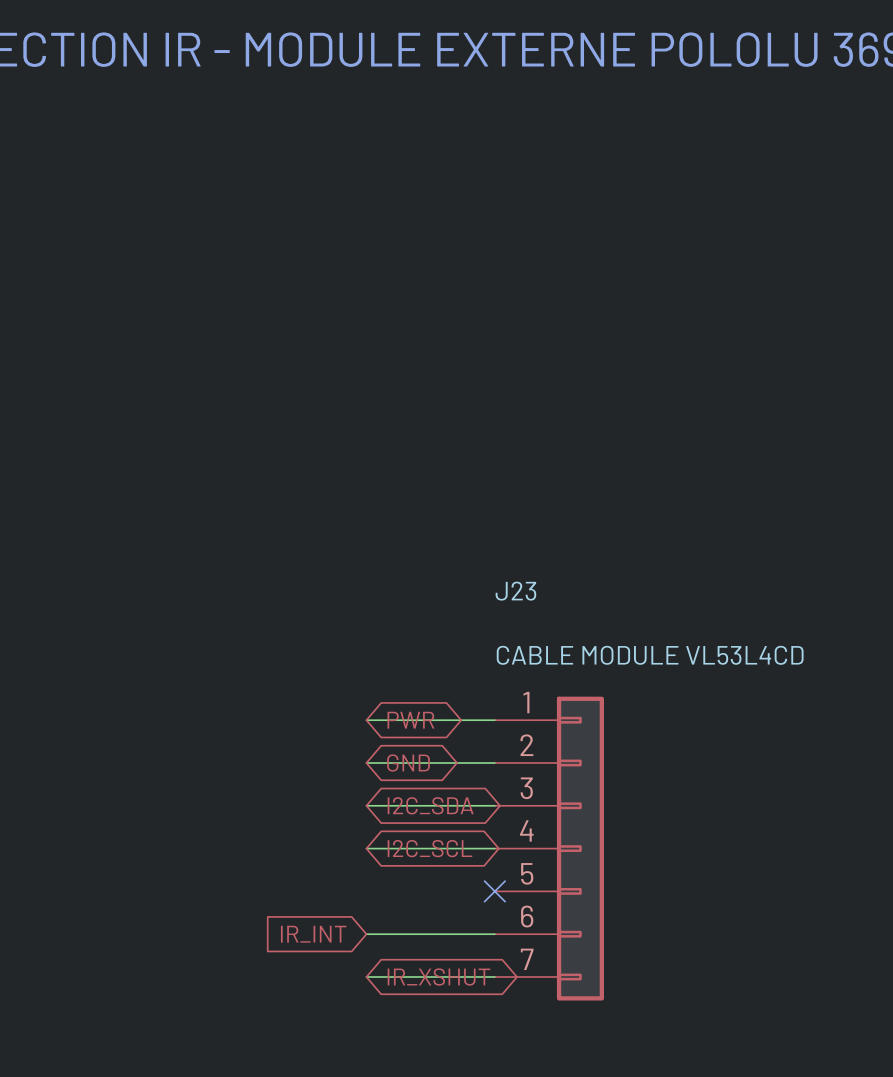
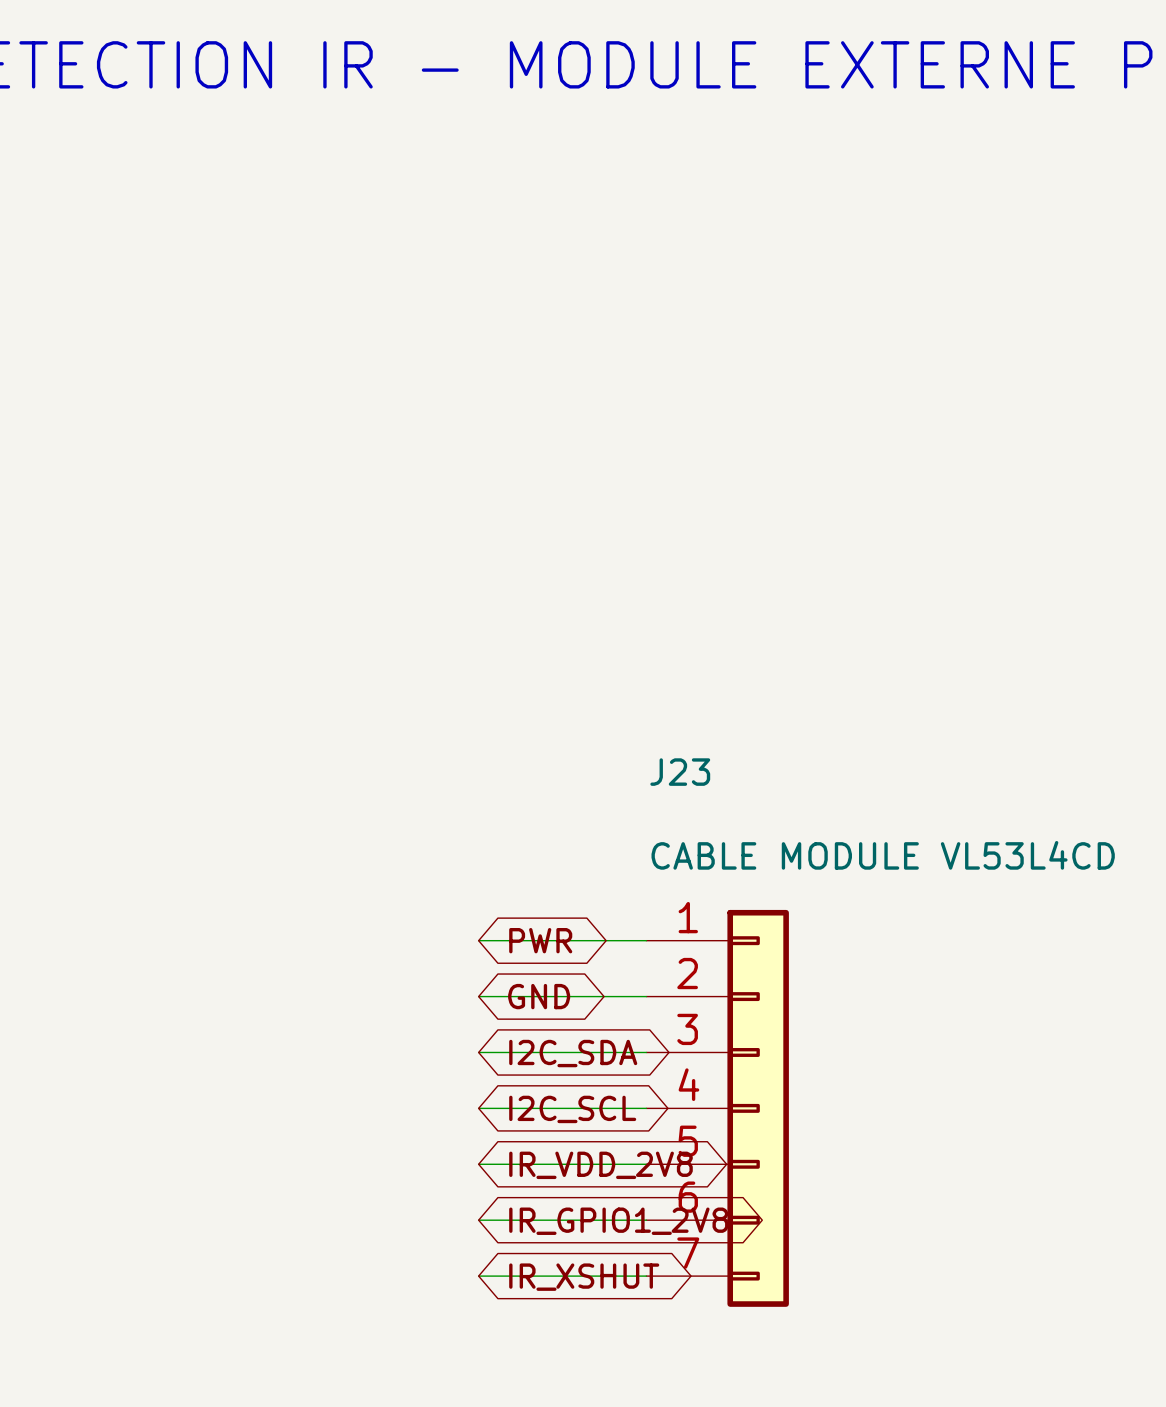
wire: none -> (478, 1164) (646, 1164)
global label: none -> IR_VDD_2V8 (600, 1165)
no-connect mark: (494, 891) -> none
global label shape: input (313, 934) -> bidirectional (618, 1221)
global label: IR_INT (313, 934) -> IR_GPIO1_2V8 (618, 1221)

